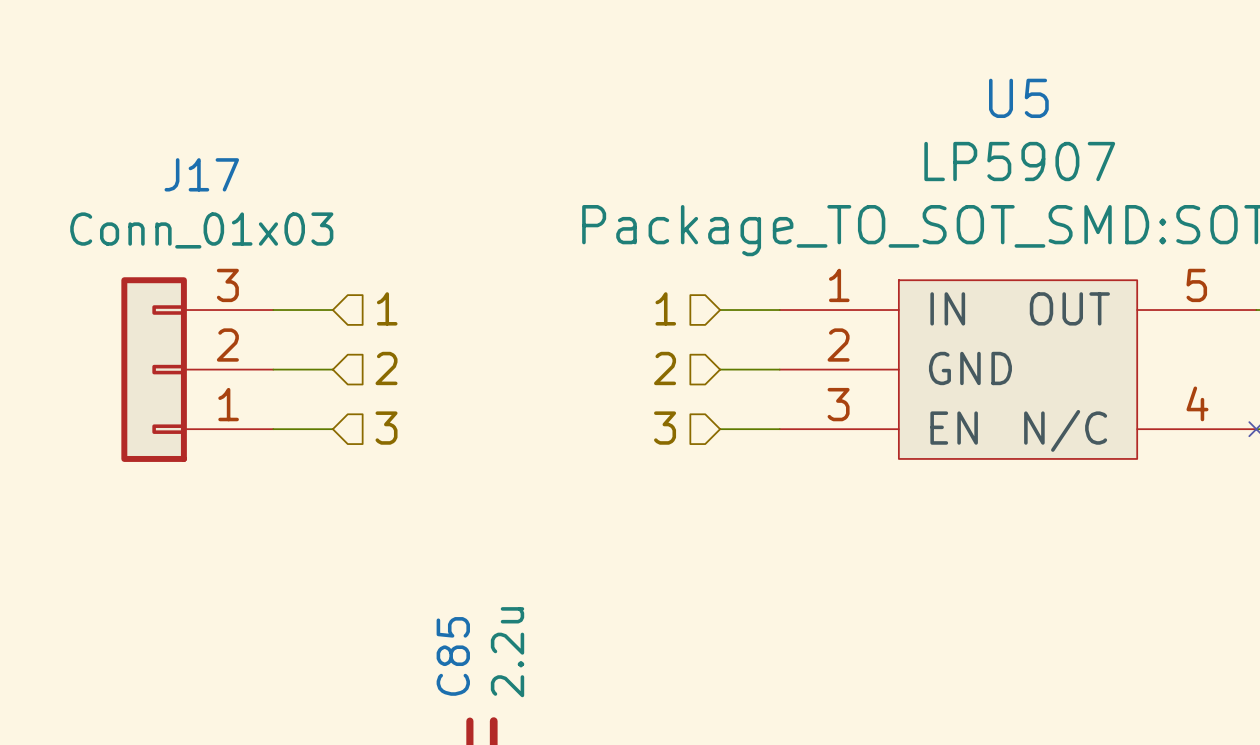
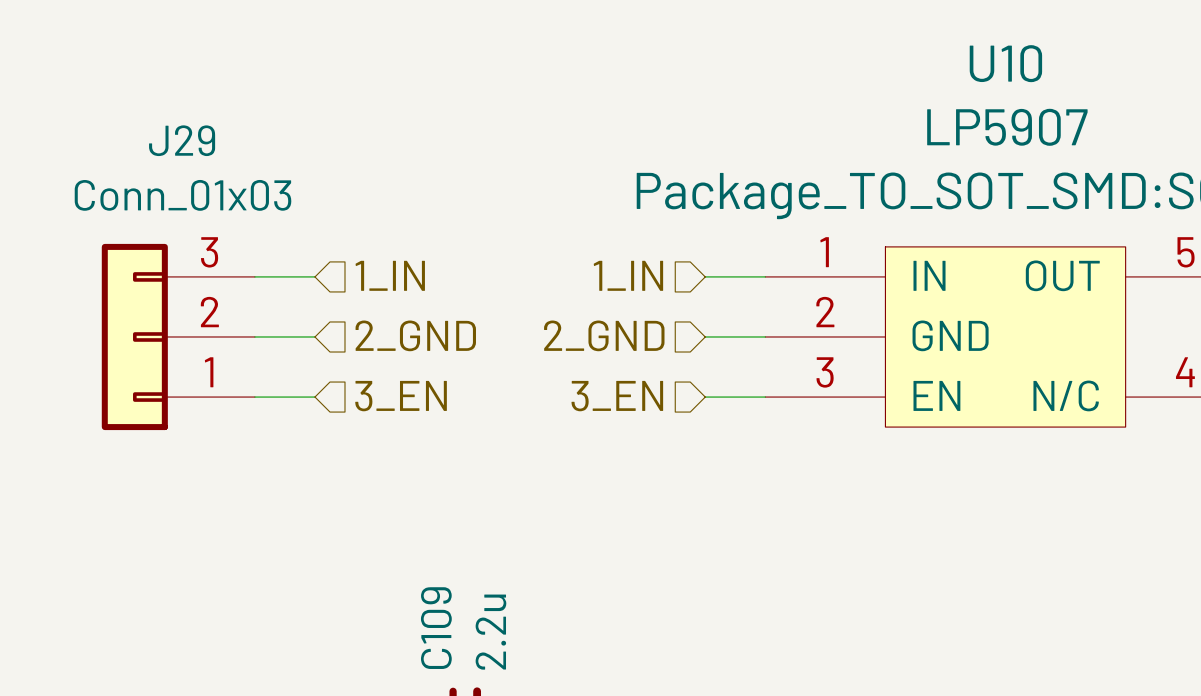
U5 name: U5 (1018, 98) -> U10 (1005, 63)
J17 name: J17 (201, 174) -> J29 (182, 140)
hierarchical label: 1 (387, 308) -> 1_IN (390, 275)
hierarchical label: 1 (665, 308) -> 1_IN (628, 275)
hierarchical label: 2 (386, 368) -> 2_GND (415, 335)
hierarchical label: 2 (665, 368) -> 2_GND (604, 335)
hierarchical label: 3 (386, 428) -> 3_EN (401, 396)
hierarchical label: 3 (665, 428) -> 3_EN (617, 396)
C85 name: C85 (453, 656) -> C109 (436, 628)

